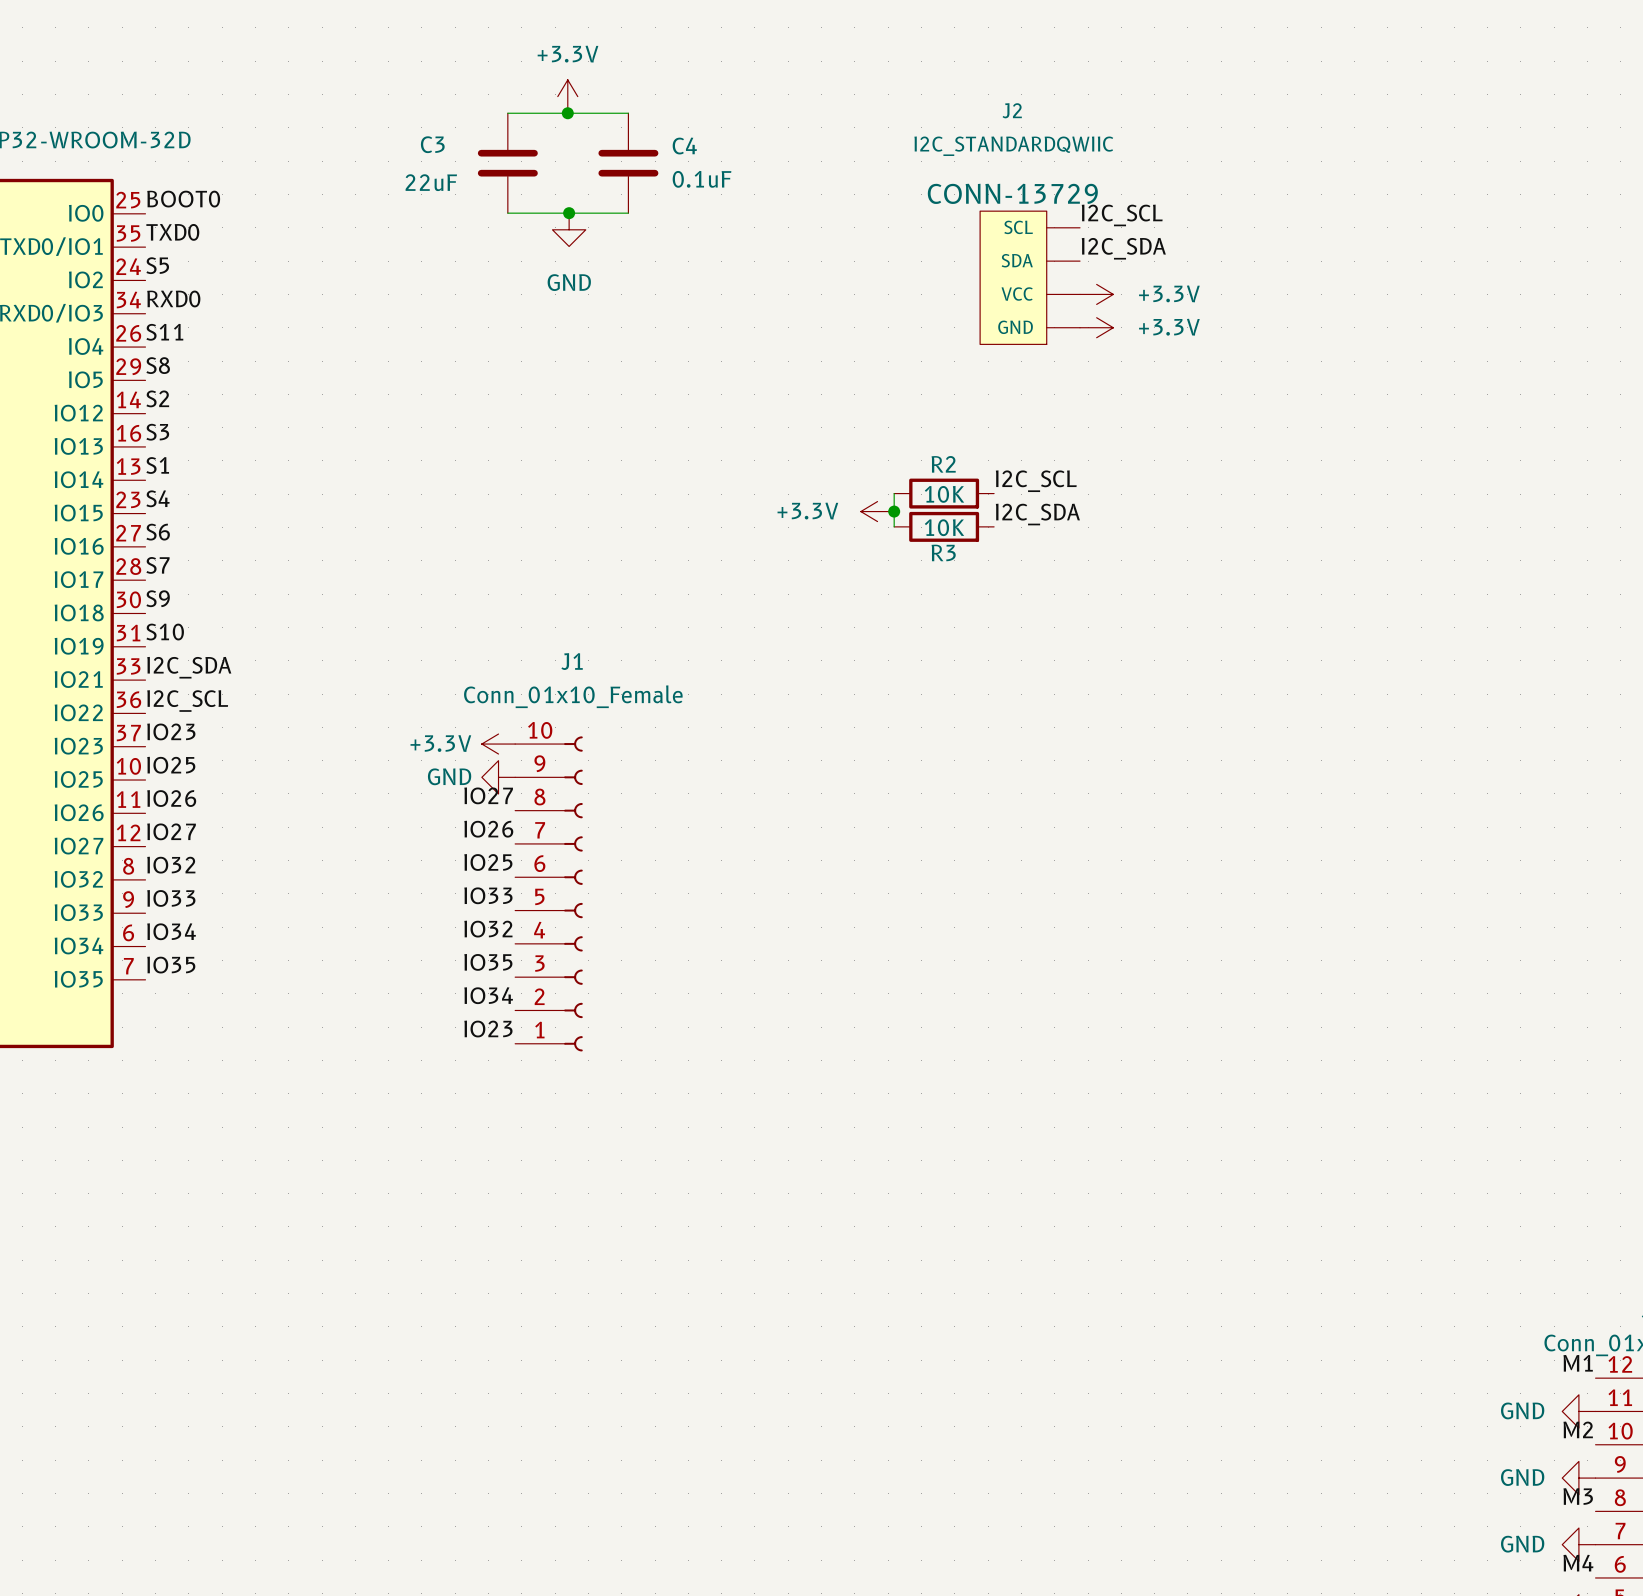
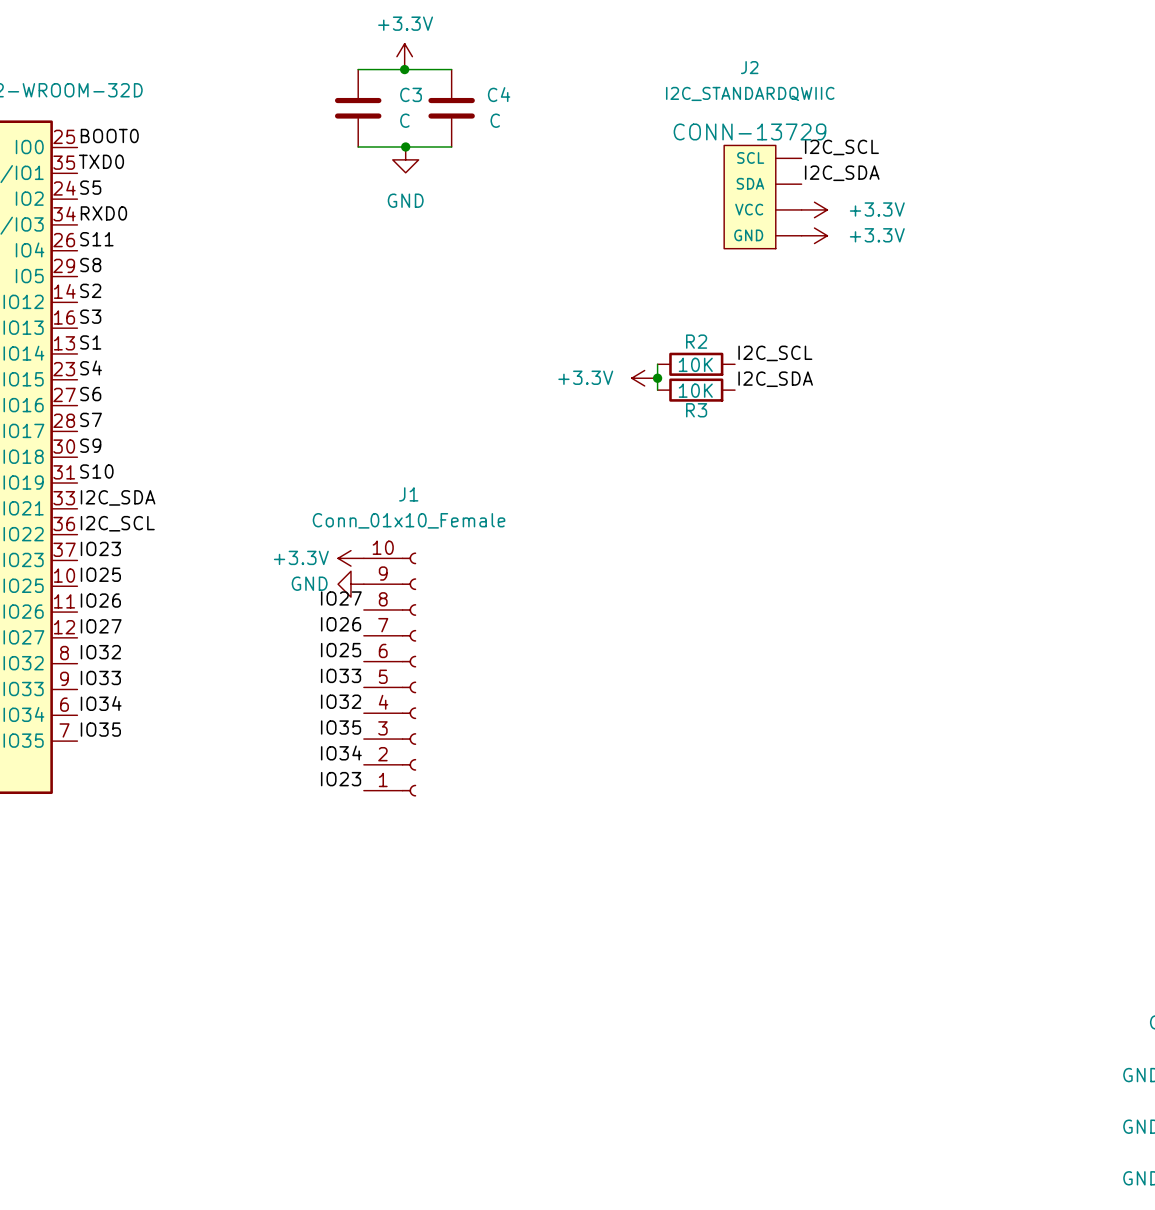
C3 name position: C3 (432, 144) -> C3 (411, 94)
C4 value: 0.1uF (702, 179) -> C (495, 120)
C3 value: 22uF (431, 182) -> C (404, 120)

